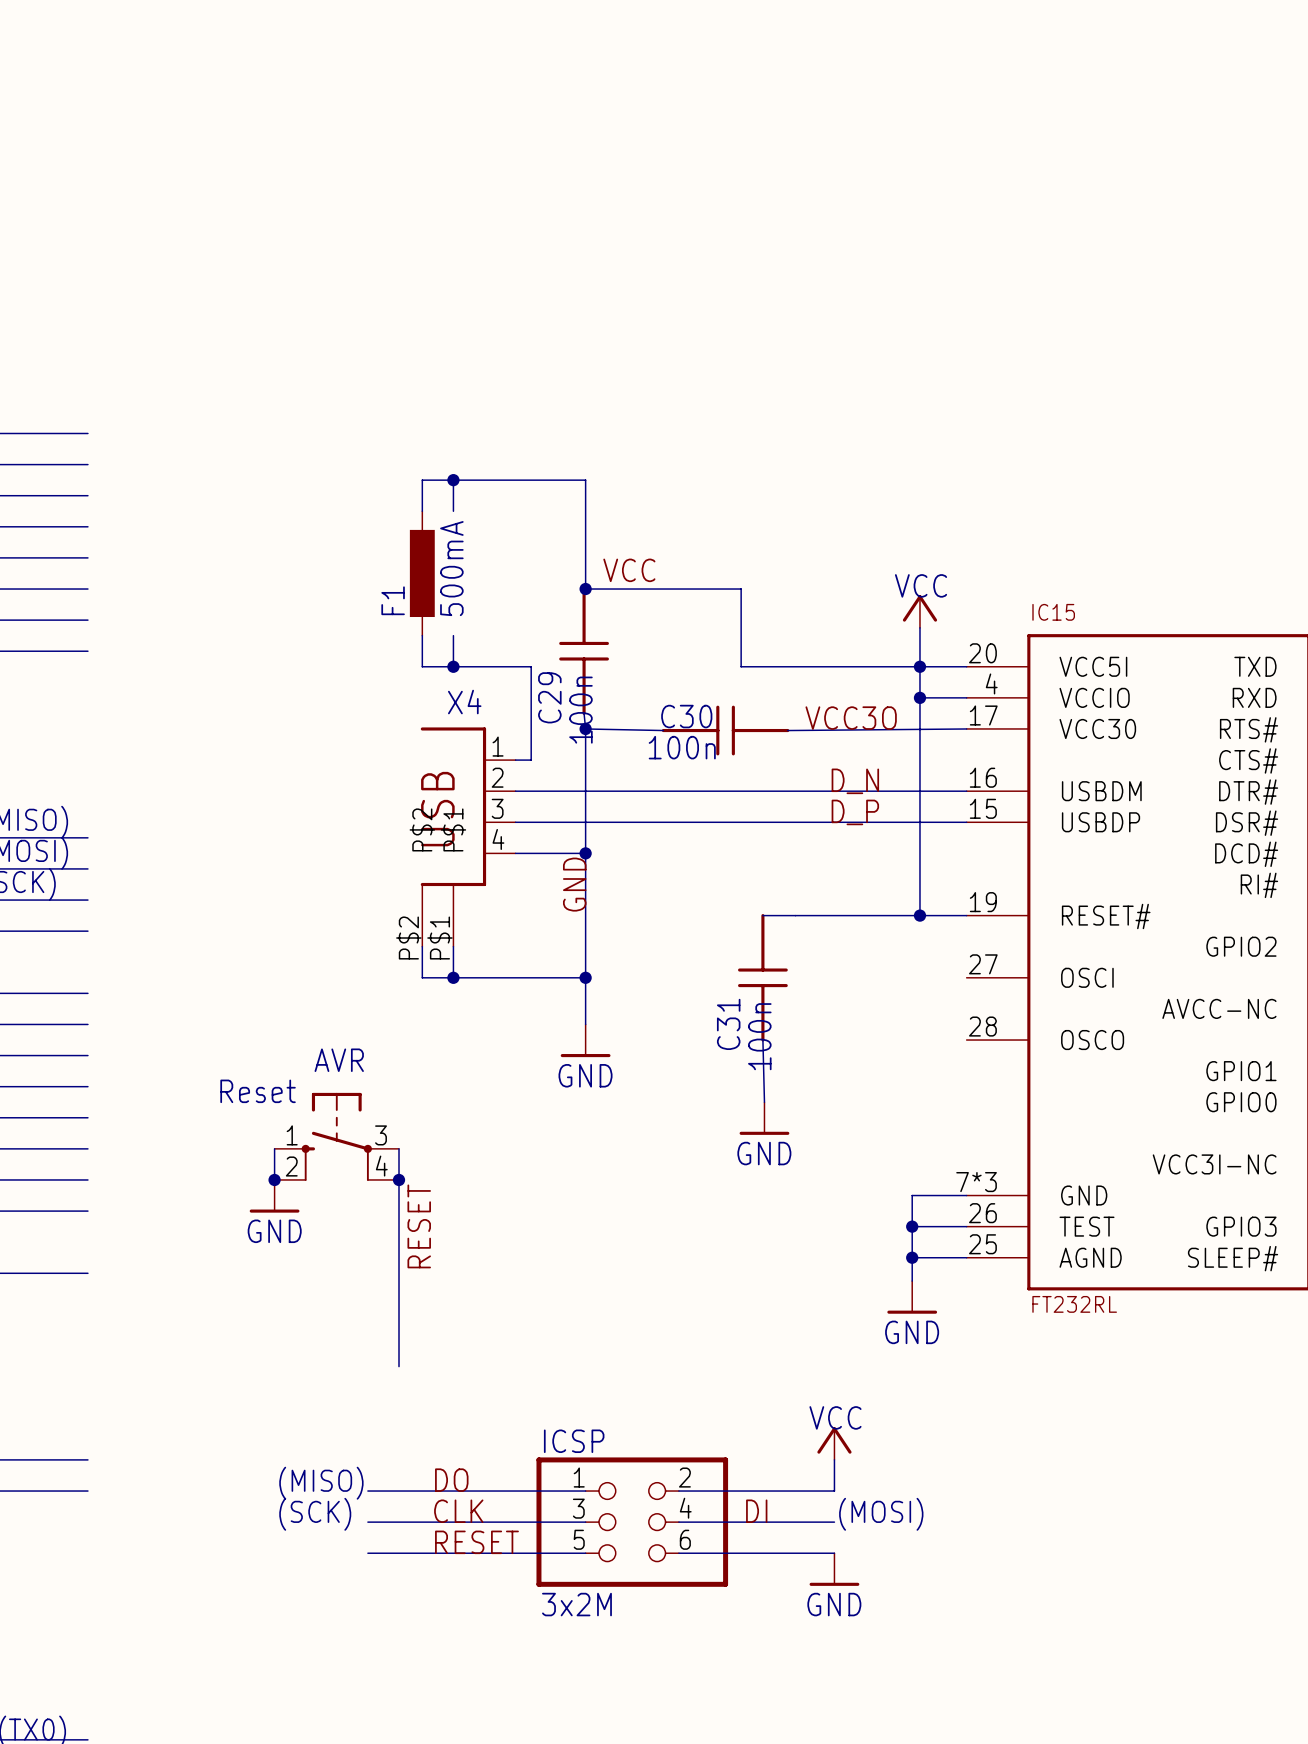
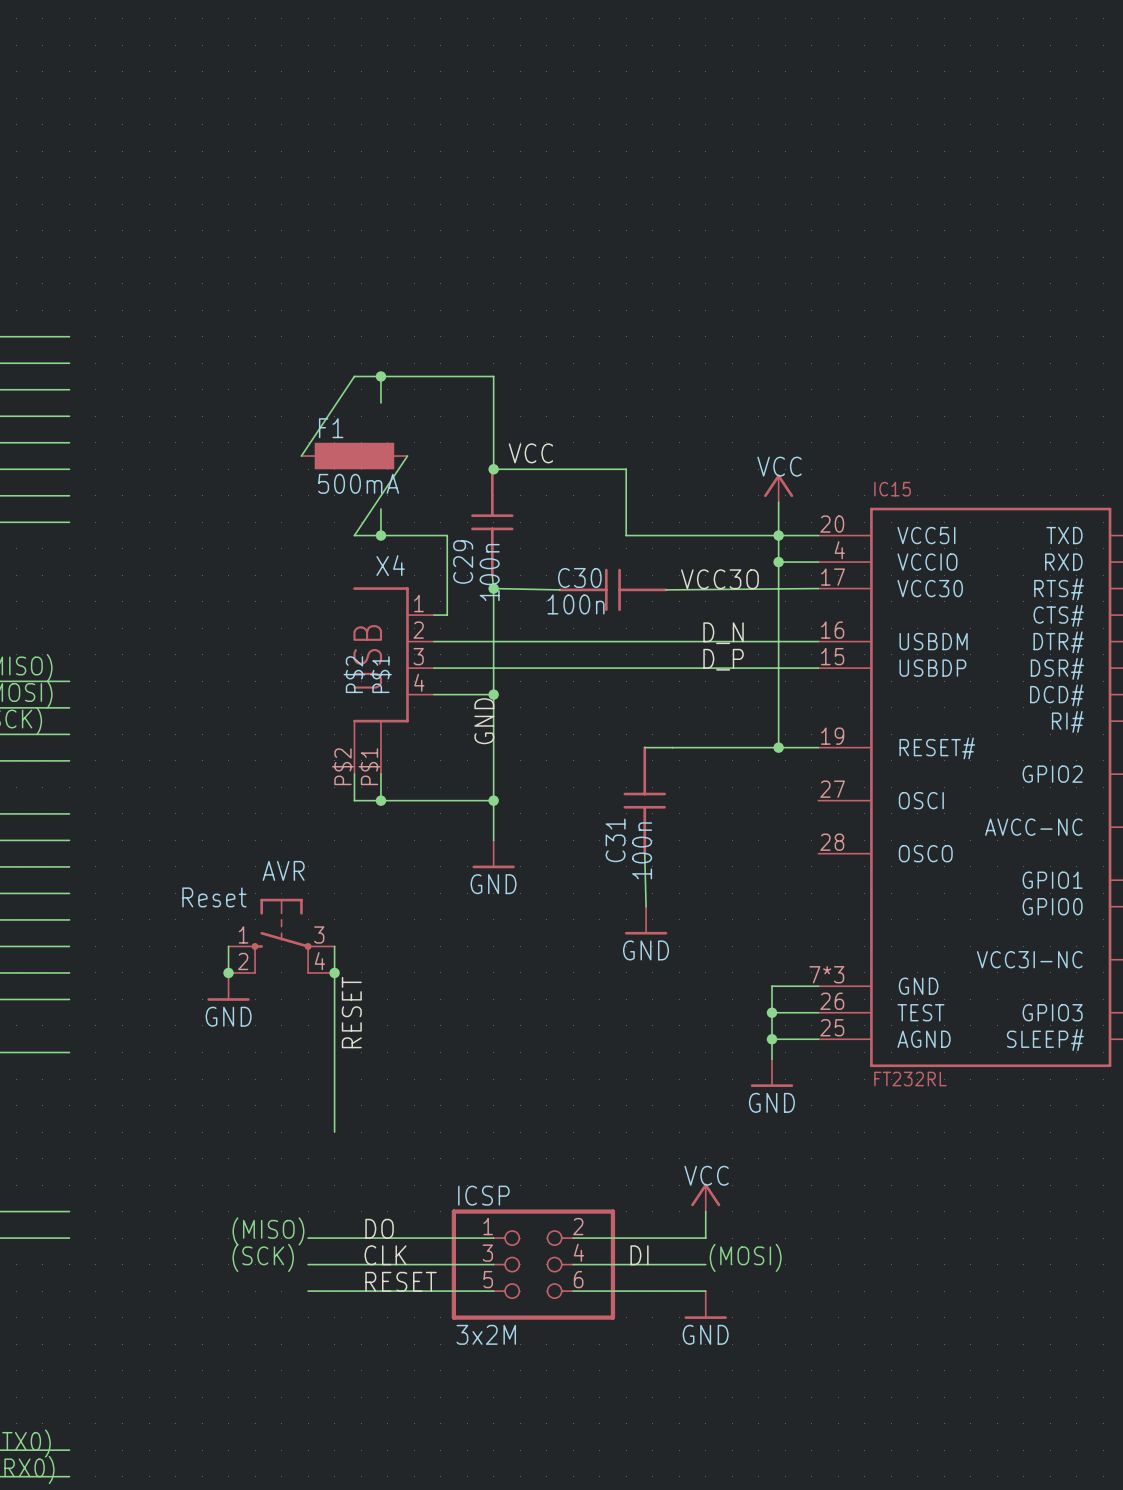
wire: (422, 480) (422, 511) -> (354, 376) (301, 456)
F1 symbol: [409, 511, 435, 636] -> [301, 442, 408, 470]
F1 value position: 500mA (451, 568) -> 500mA (358, 483)
F1 name position: F1 (393, 600) -> F1 (331, 428)
wire: (422, 635) (422, 666) -> (407, 456) (354, 535)

